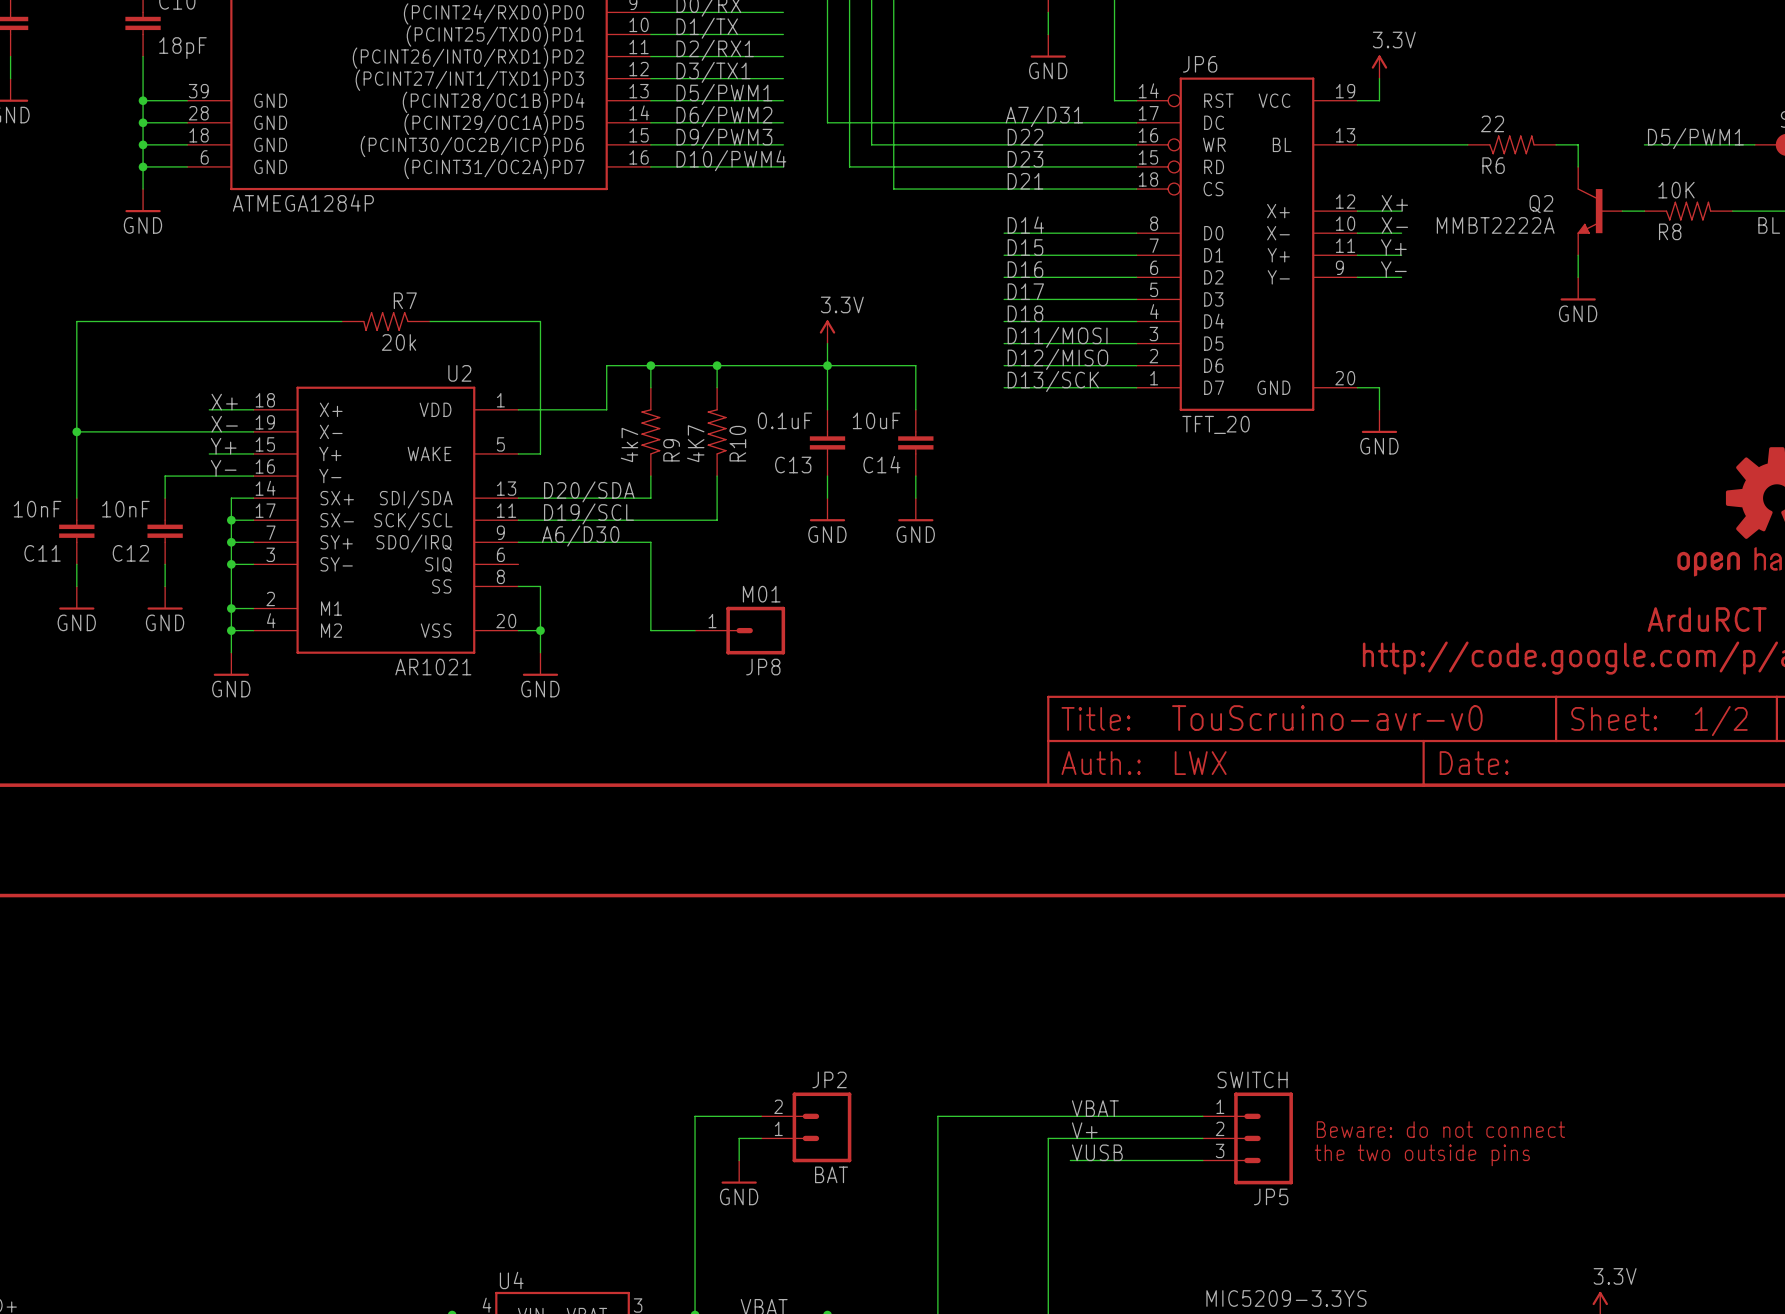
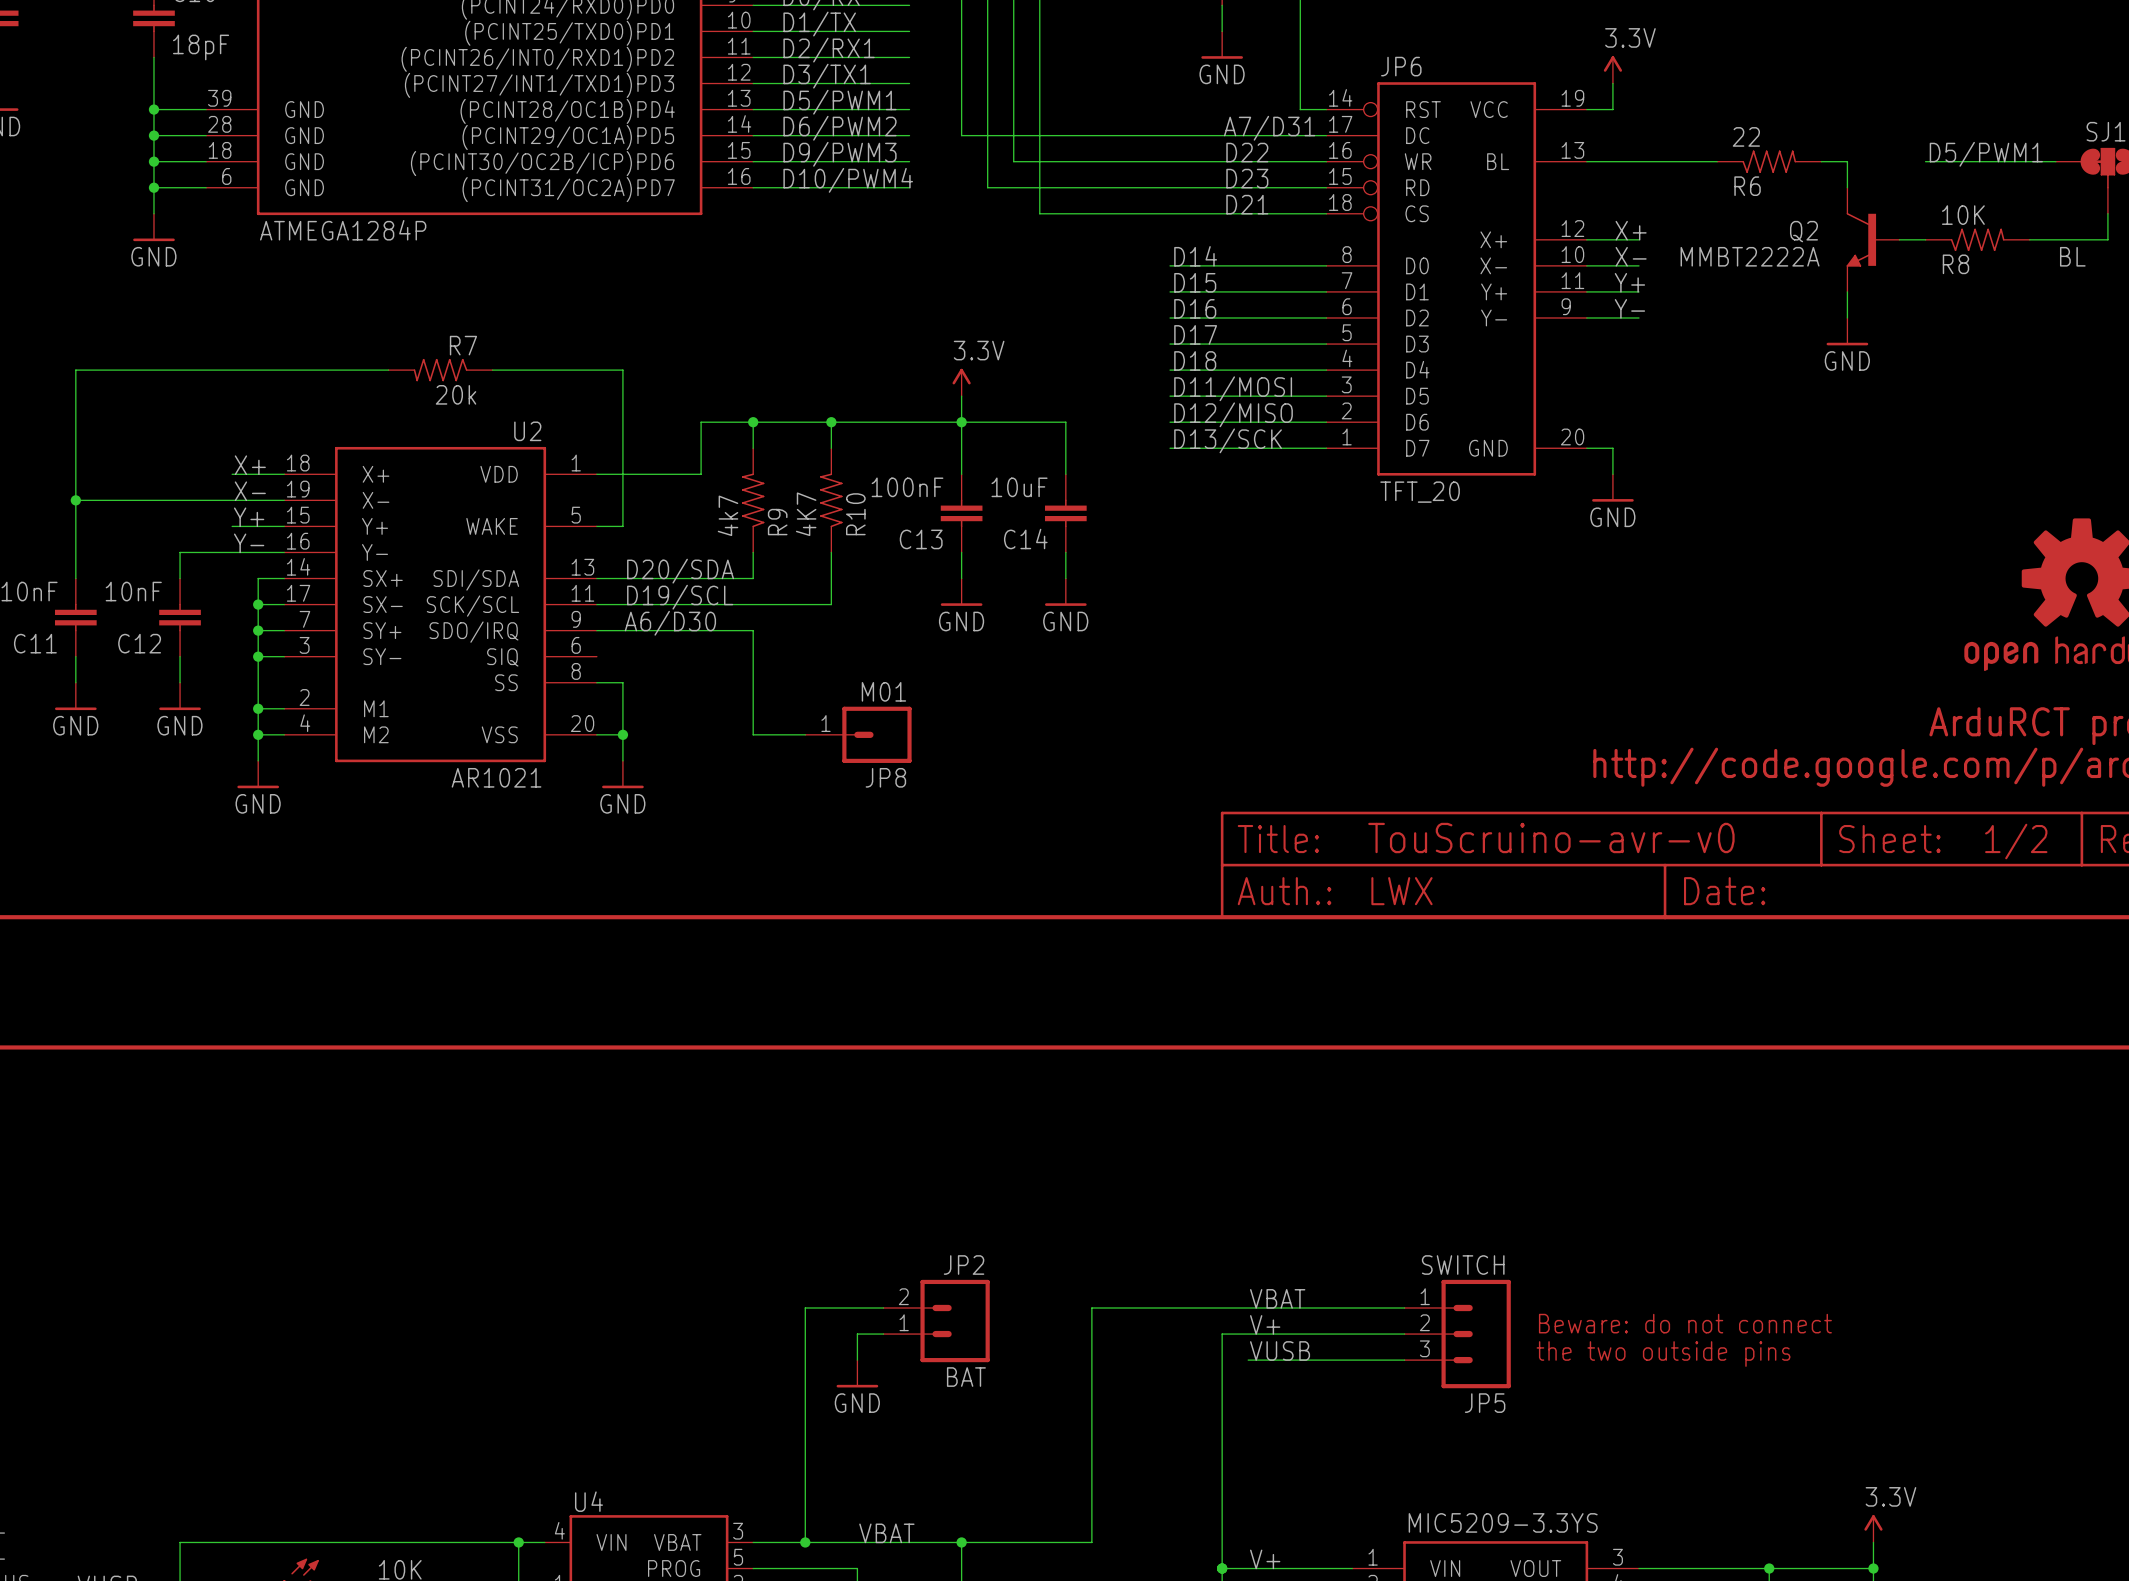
label position: A7/D31 (1044, 116) -> A7/D31 (1269, 128)
label position: D22 (1025, 137) -> D22 (1247, 152)
label position: D23 (1025, 159) -> D23 (1247, 178)
label position: D21 (1025, 181) -> D21 (1247, 204)
C13 value: 0.1uF (784, 420) -> 100nF (907, 487)

